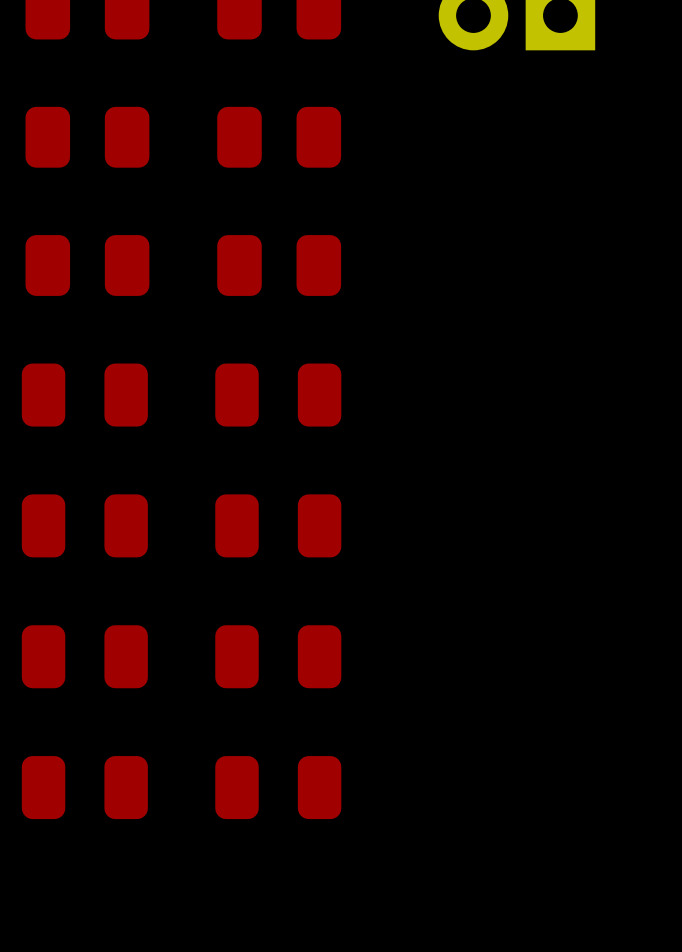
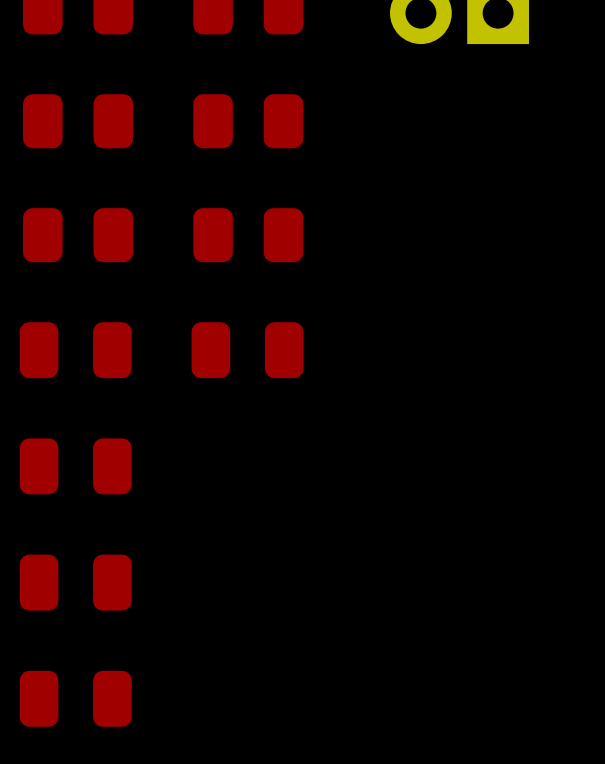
part: (278, 525) -> none
part: (278, 656) -> none
part: (278, 787) -> none

